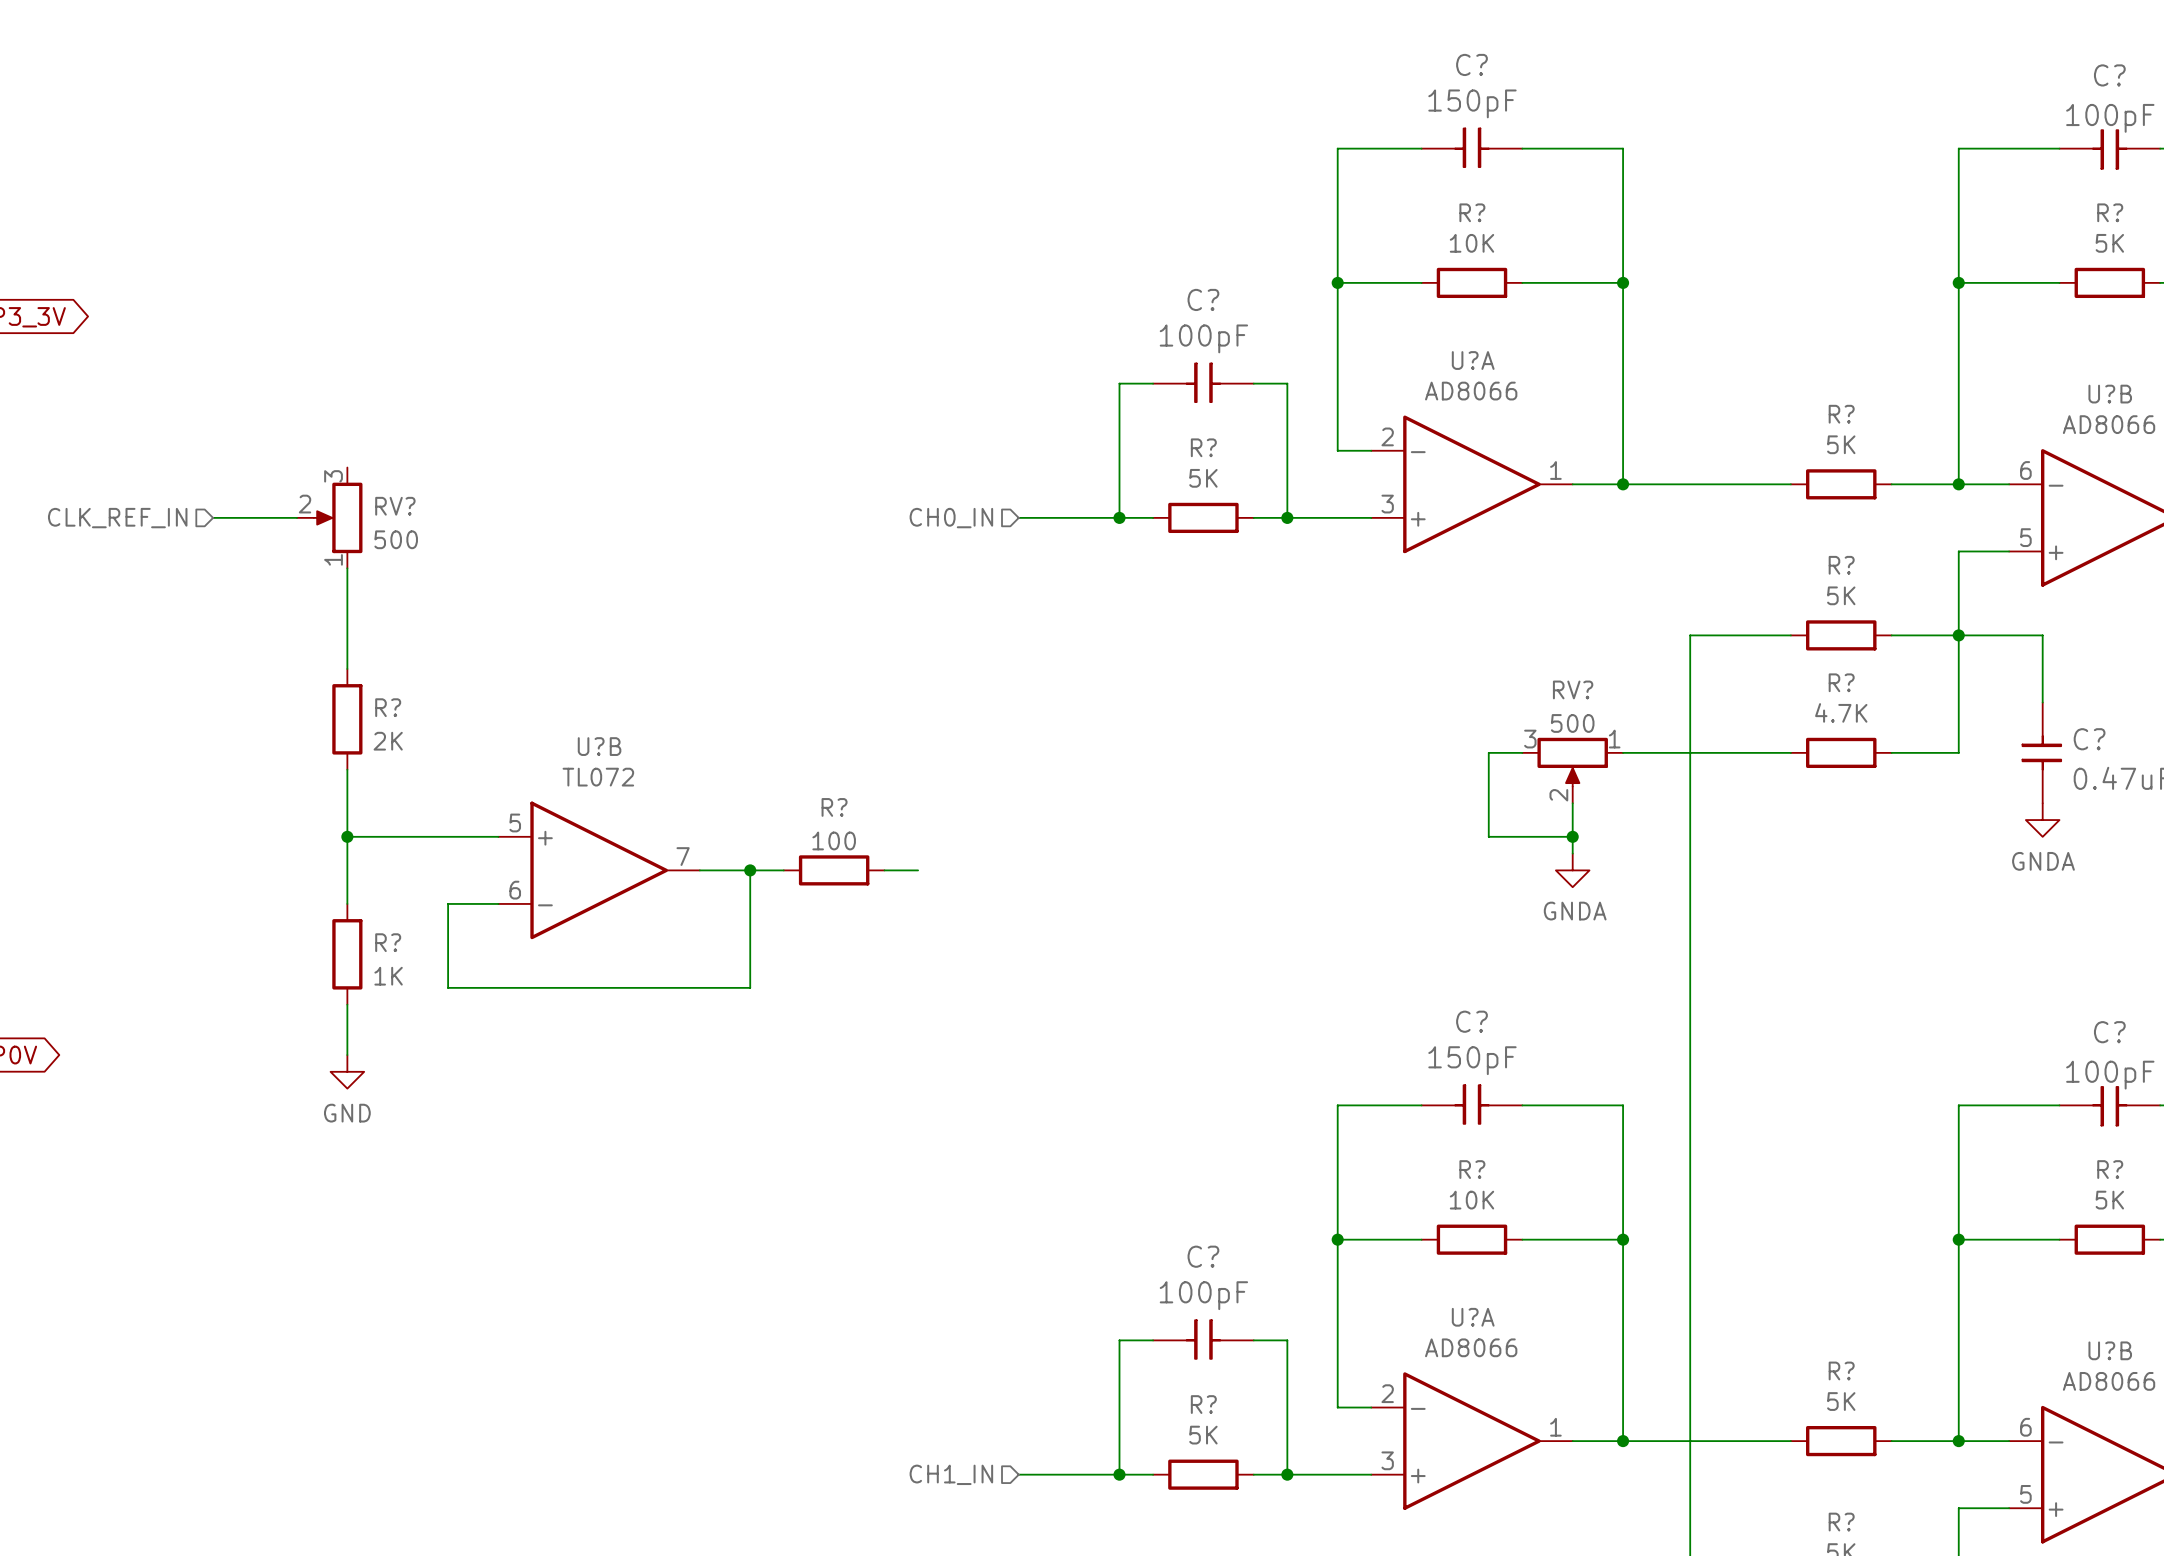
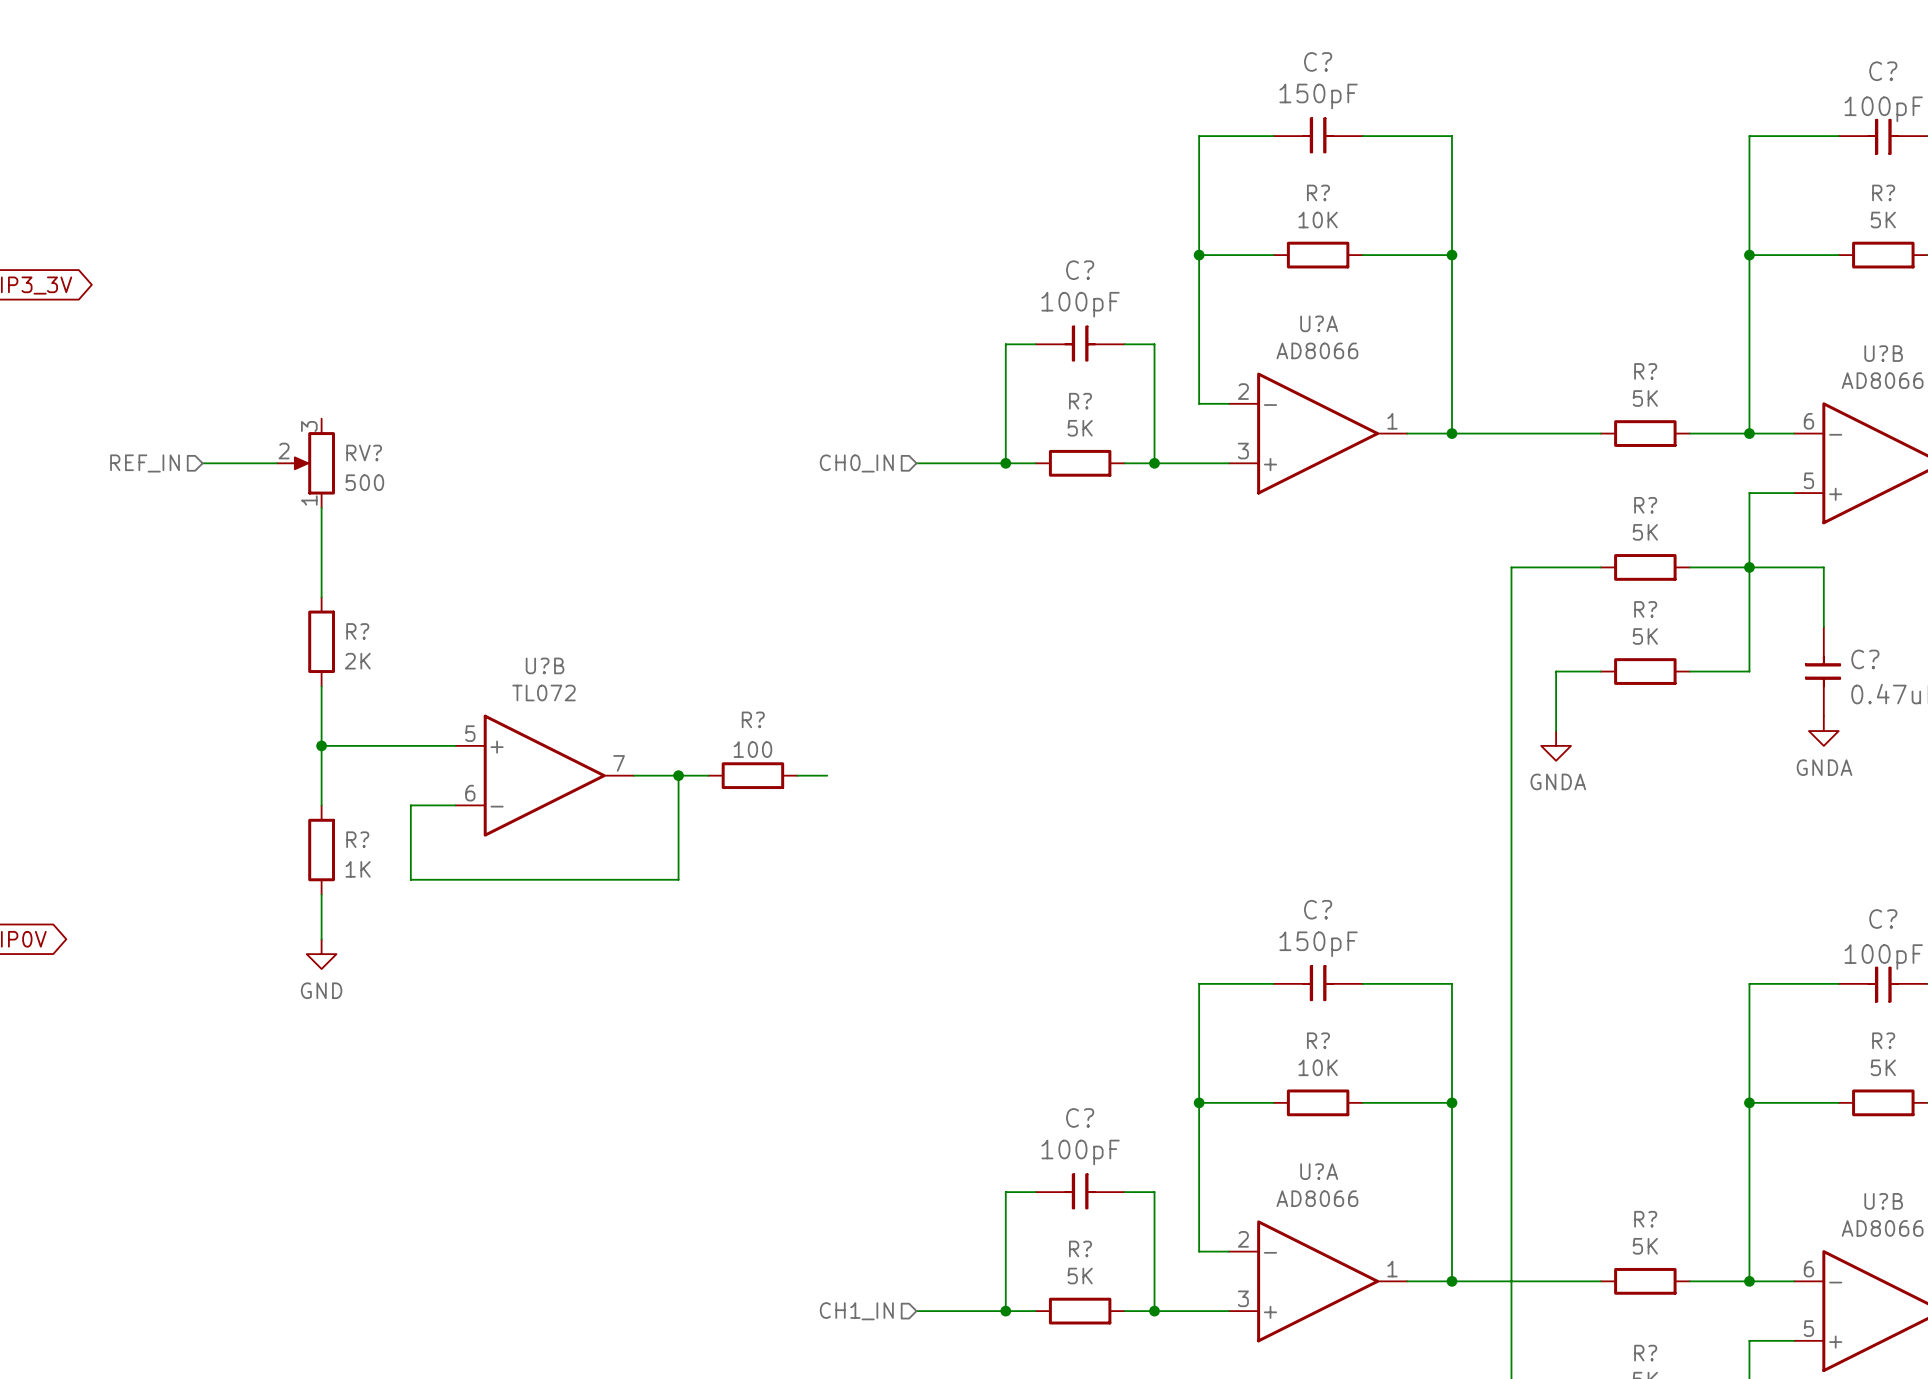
hierarchical label: CLK_REF_IN (117, 518) -> REF_IN (145, 463)
R? value: 4.7K (1841, 712) -> 5K (1645, 636)
wire: (1522, 752) (1488, 752) (1488, 836) (1572, 836) -> none
wire: (1623, 752) (1740, 752) -> (1556, 731) (1556, 671)
RV?: 500 (1572, 770) -> none
wire: (1572, 803) (1572, 853) -> none
junction: (1572, 836) -> none
power symbol position: GNDA (1572, 870) -> GNDA (1556, 745)

